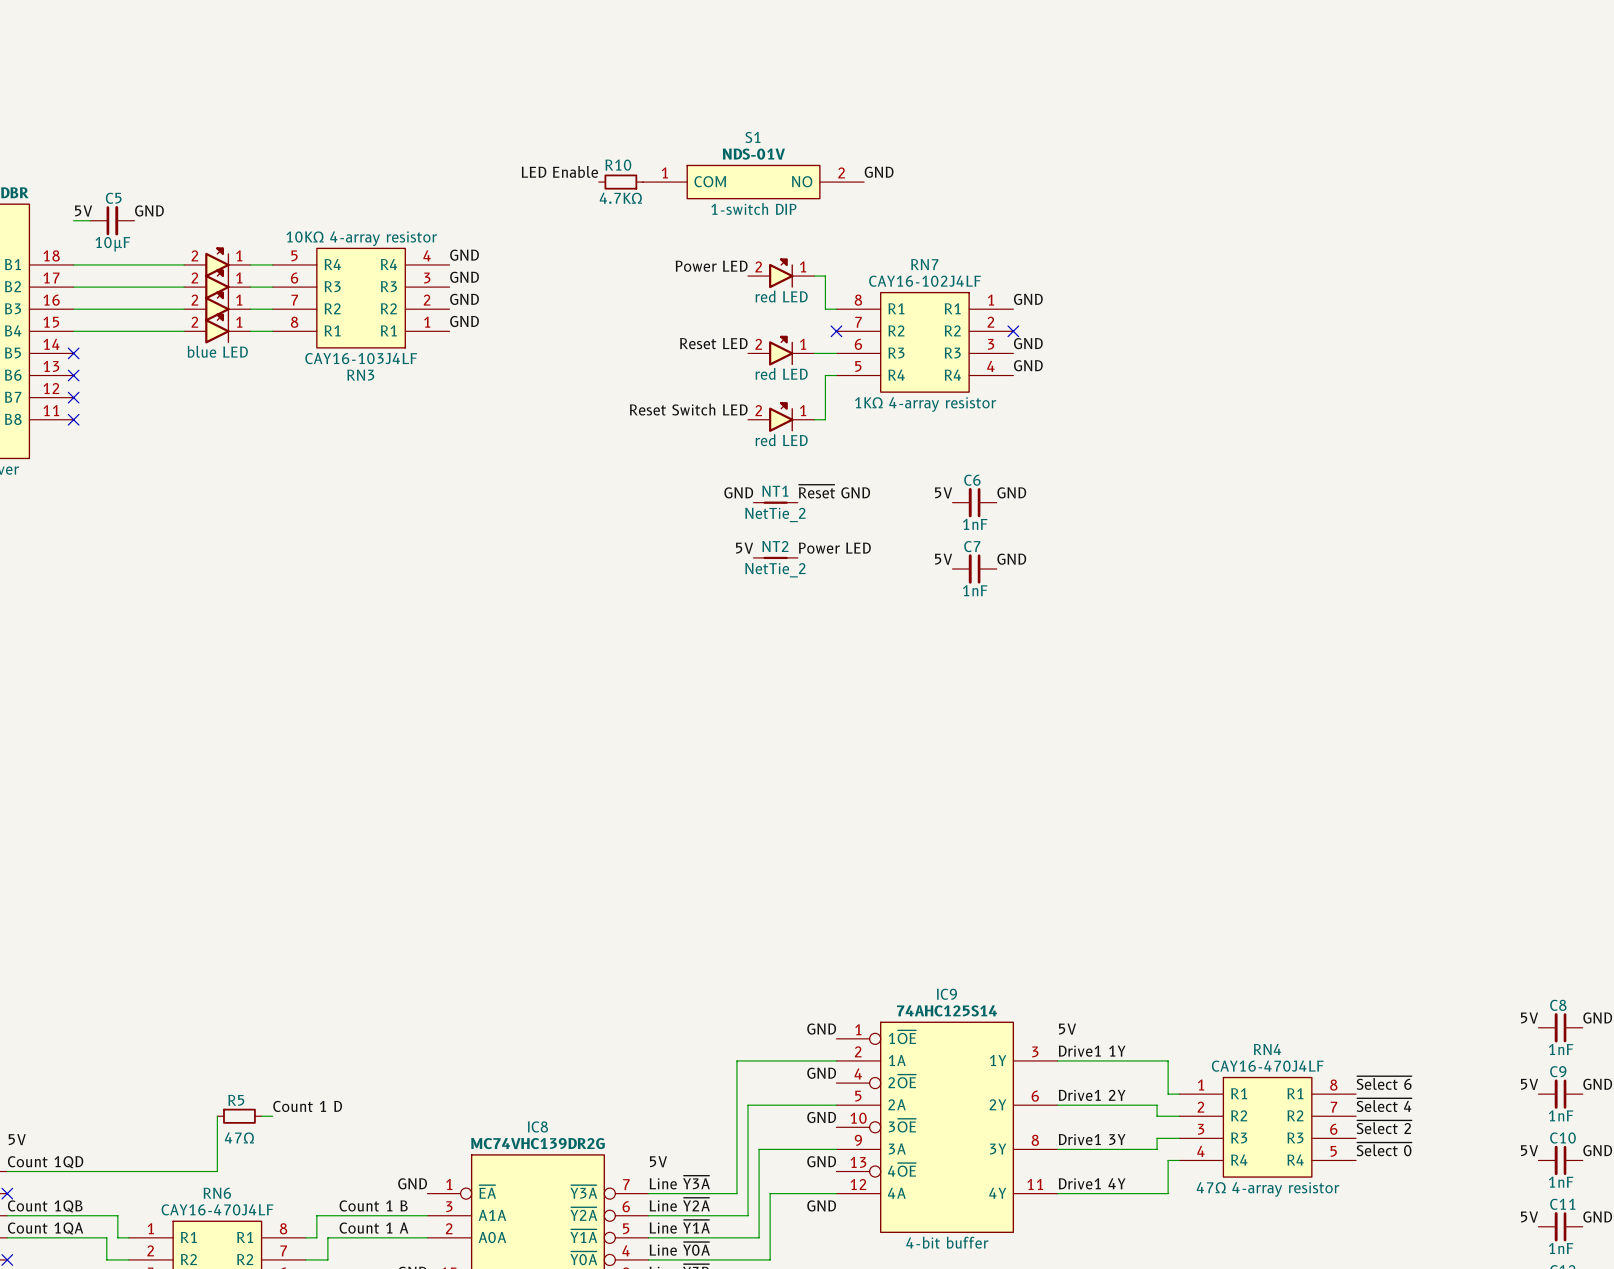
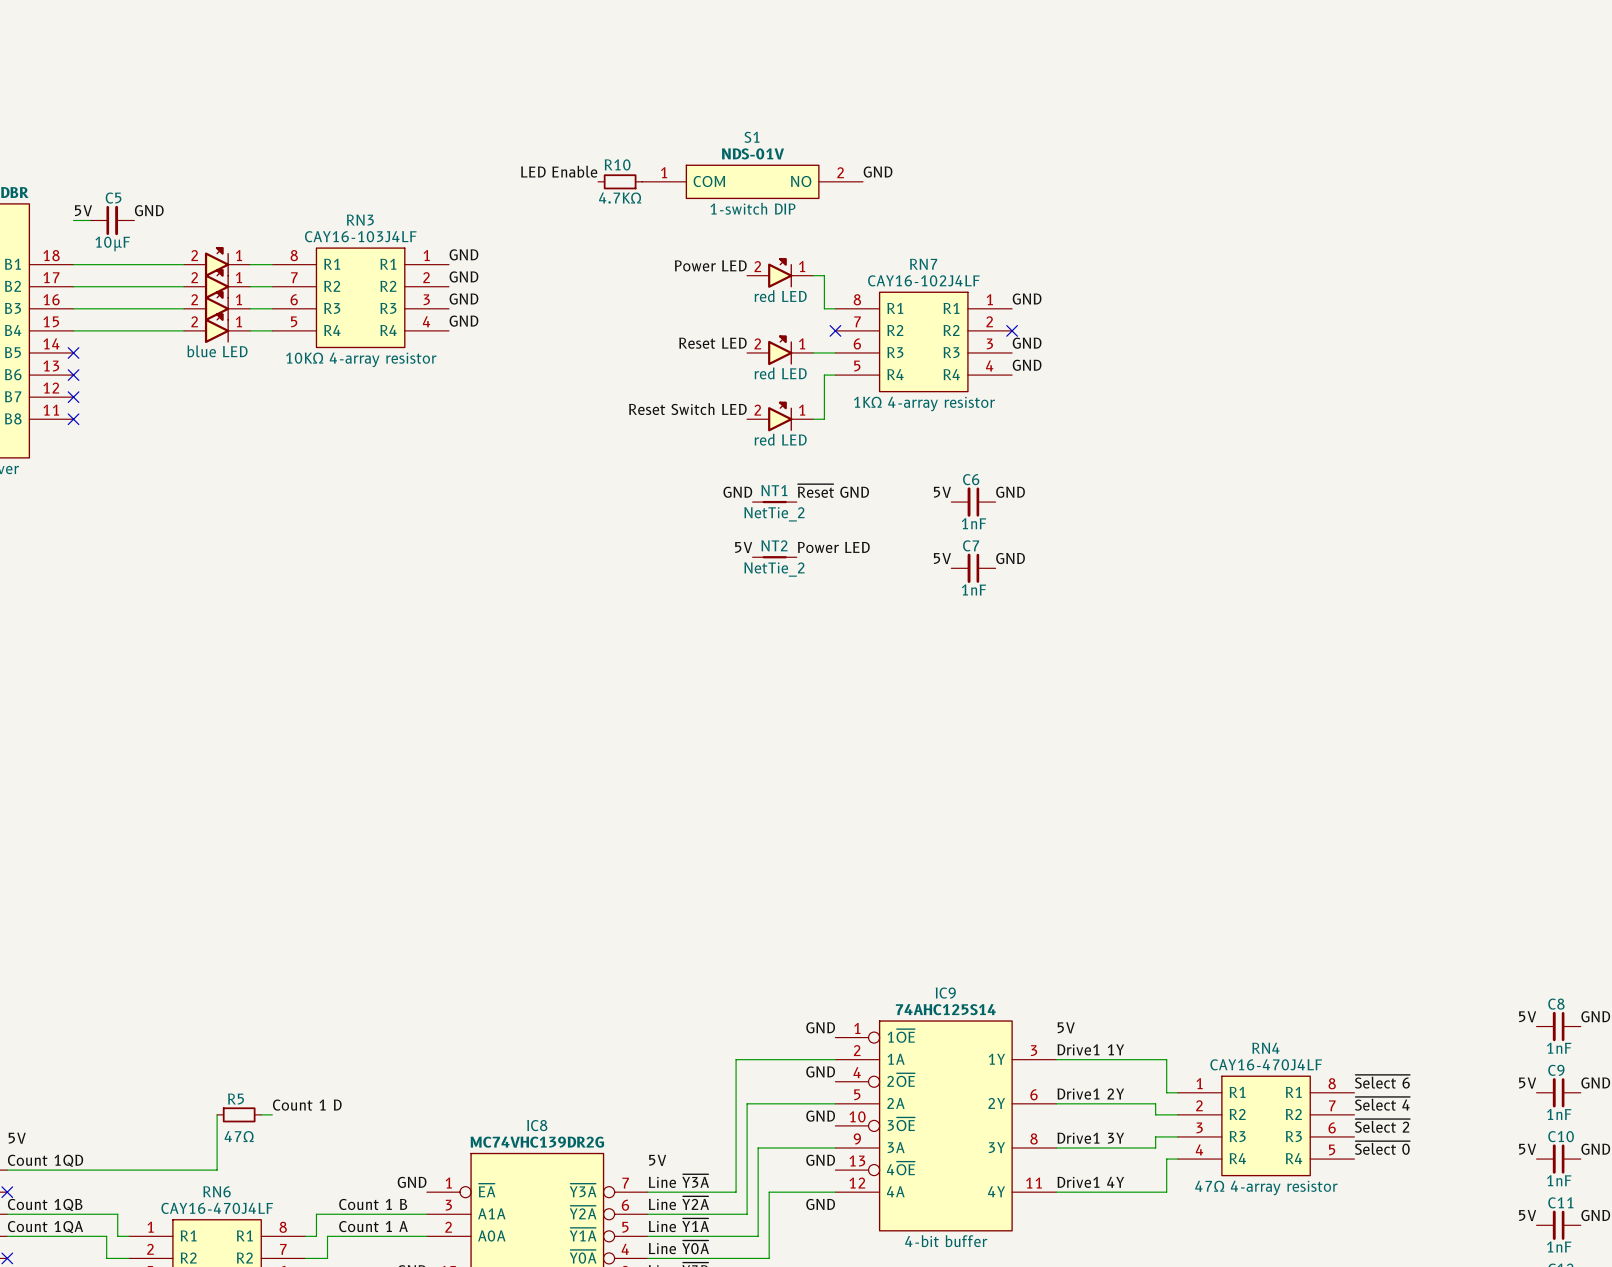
RN3 flip: as is (361, 298) -> up-down (360, 297)

